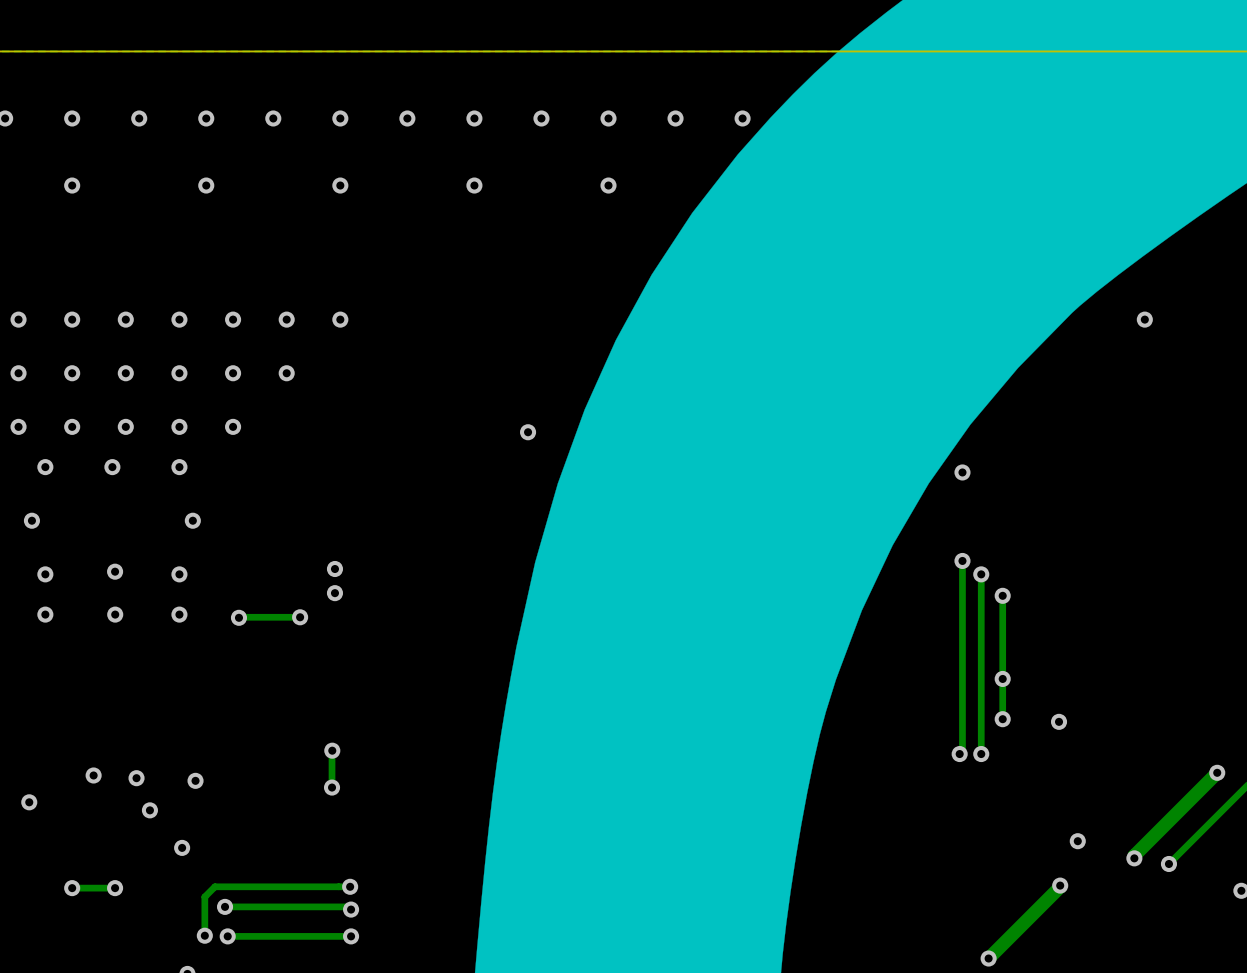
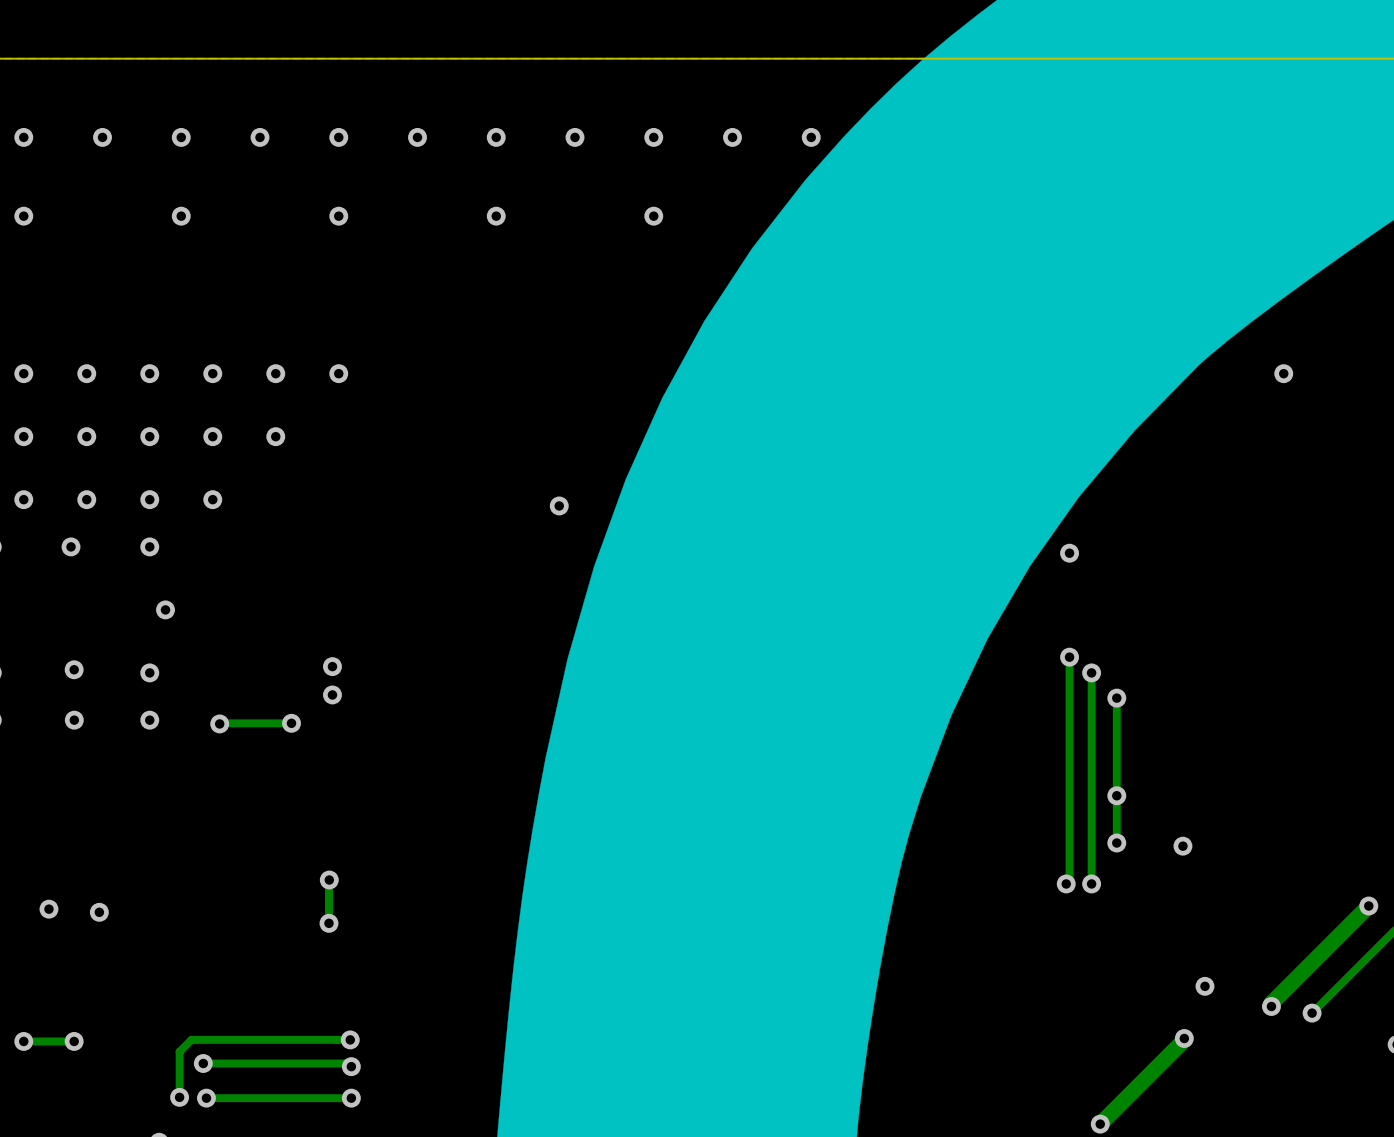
via: (195, 780) -> none
via: (149, 810) -> none
via: (182, 847) -> none

